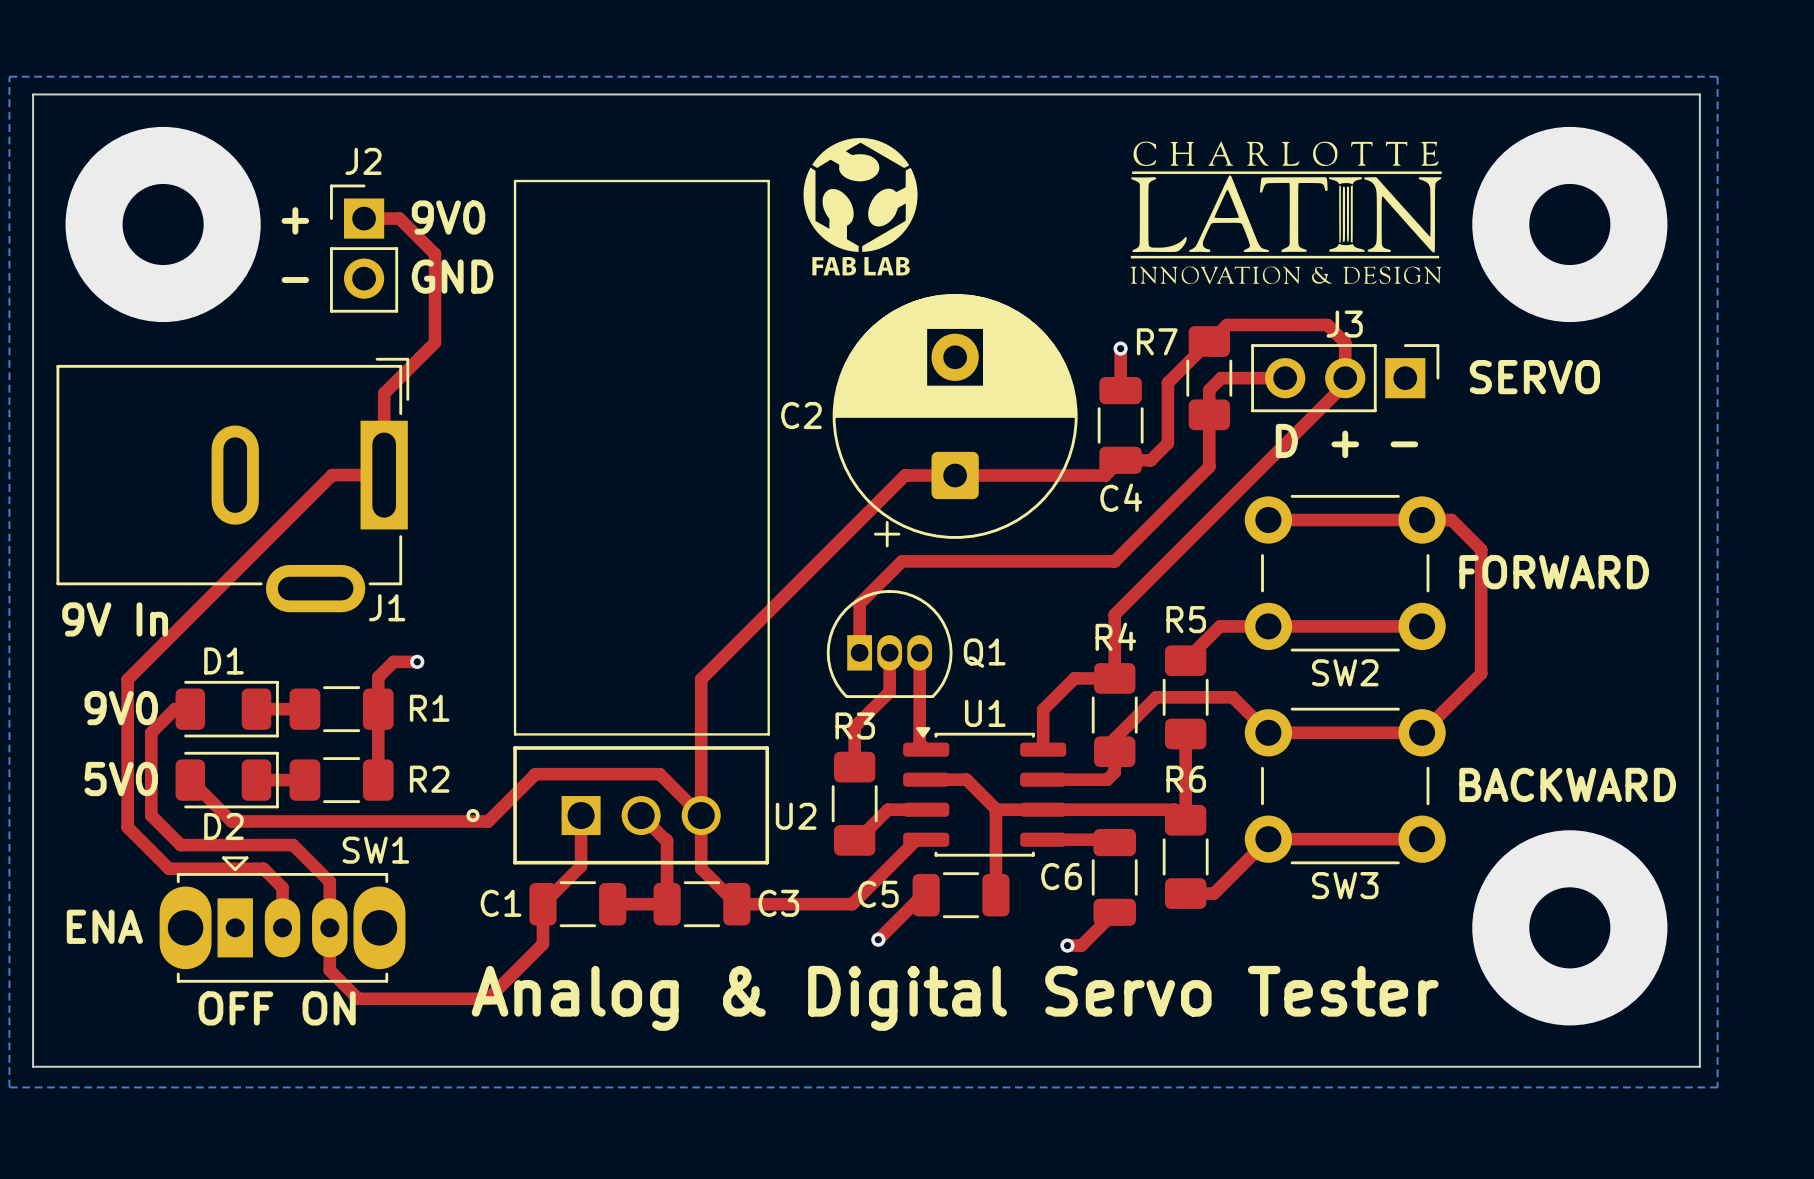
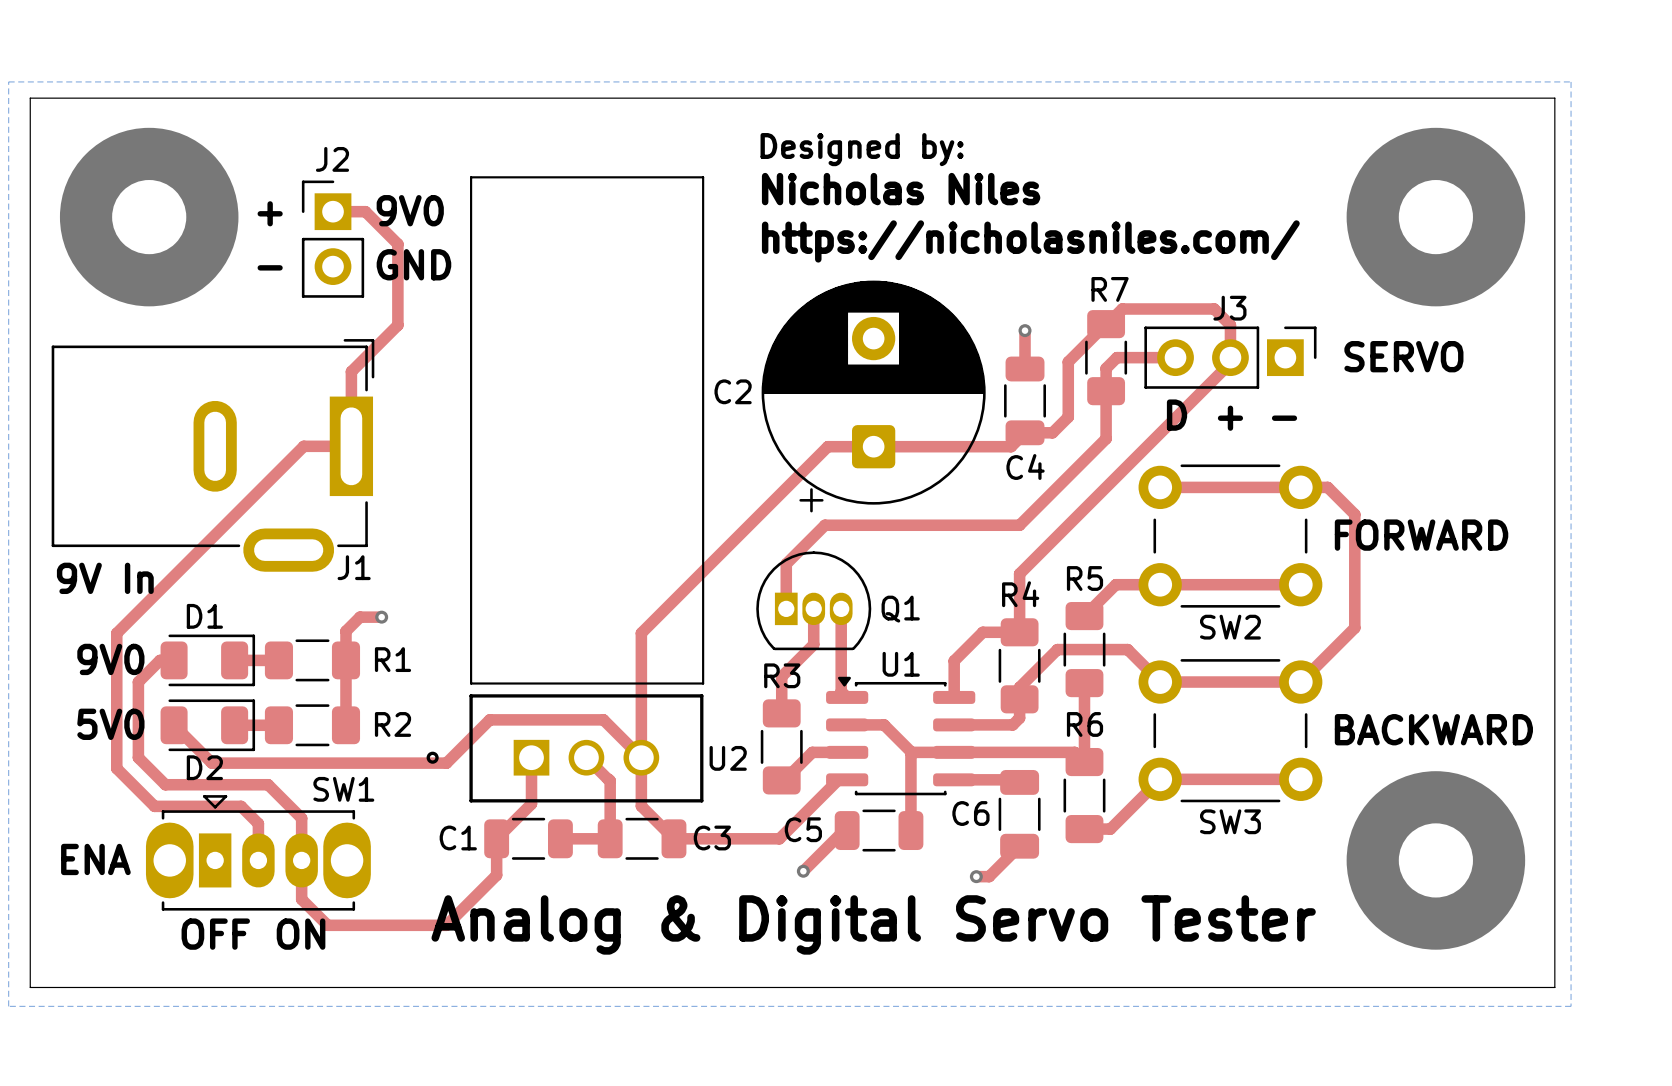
drawing: [803, 138, 918, 276] -> none
drawing: [1130, 141, 1442, 285] -> none
text: none -> Designed by: (862, 149)
text: none -> Nicholas Niles (901, 189)
text: none -> https://nicholasniles.com/ (1030, 241)
R7 name position: R7 (1157, 341) -> R7 (1110, 289)

